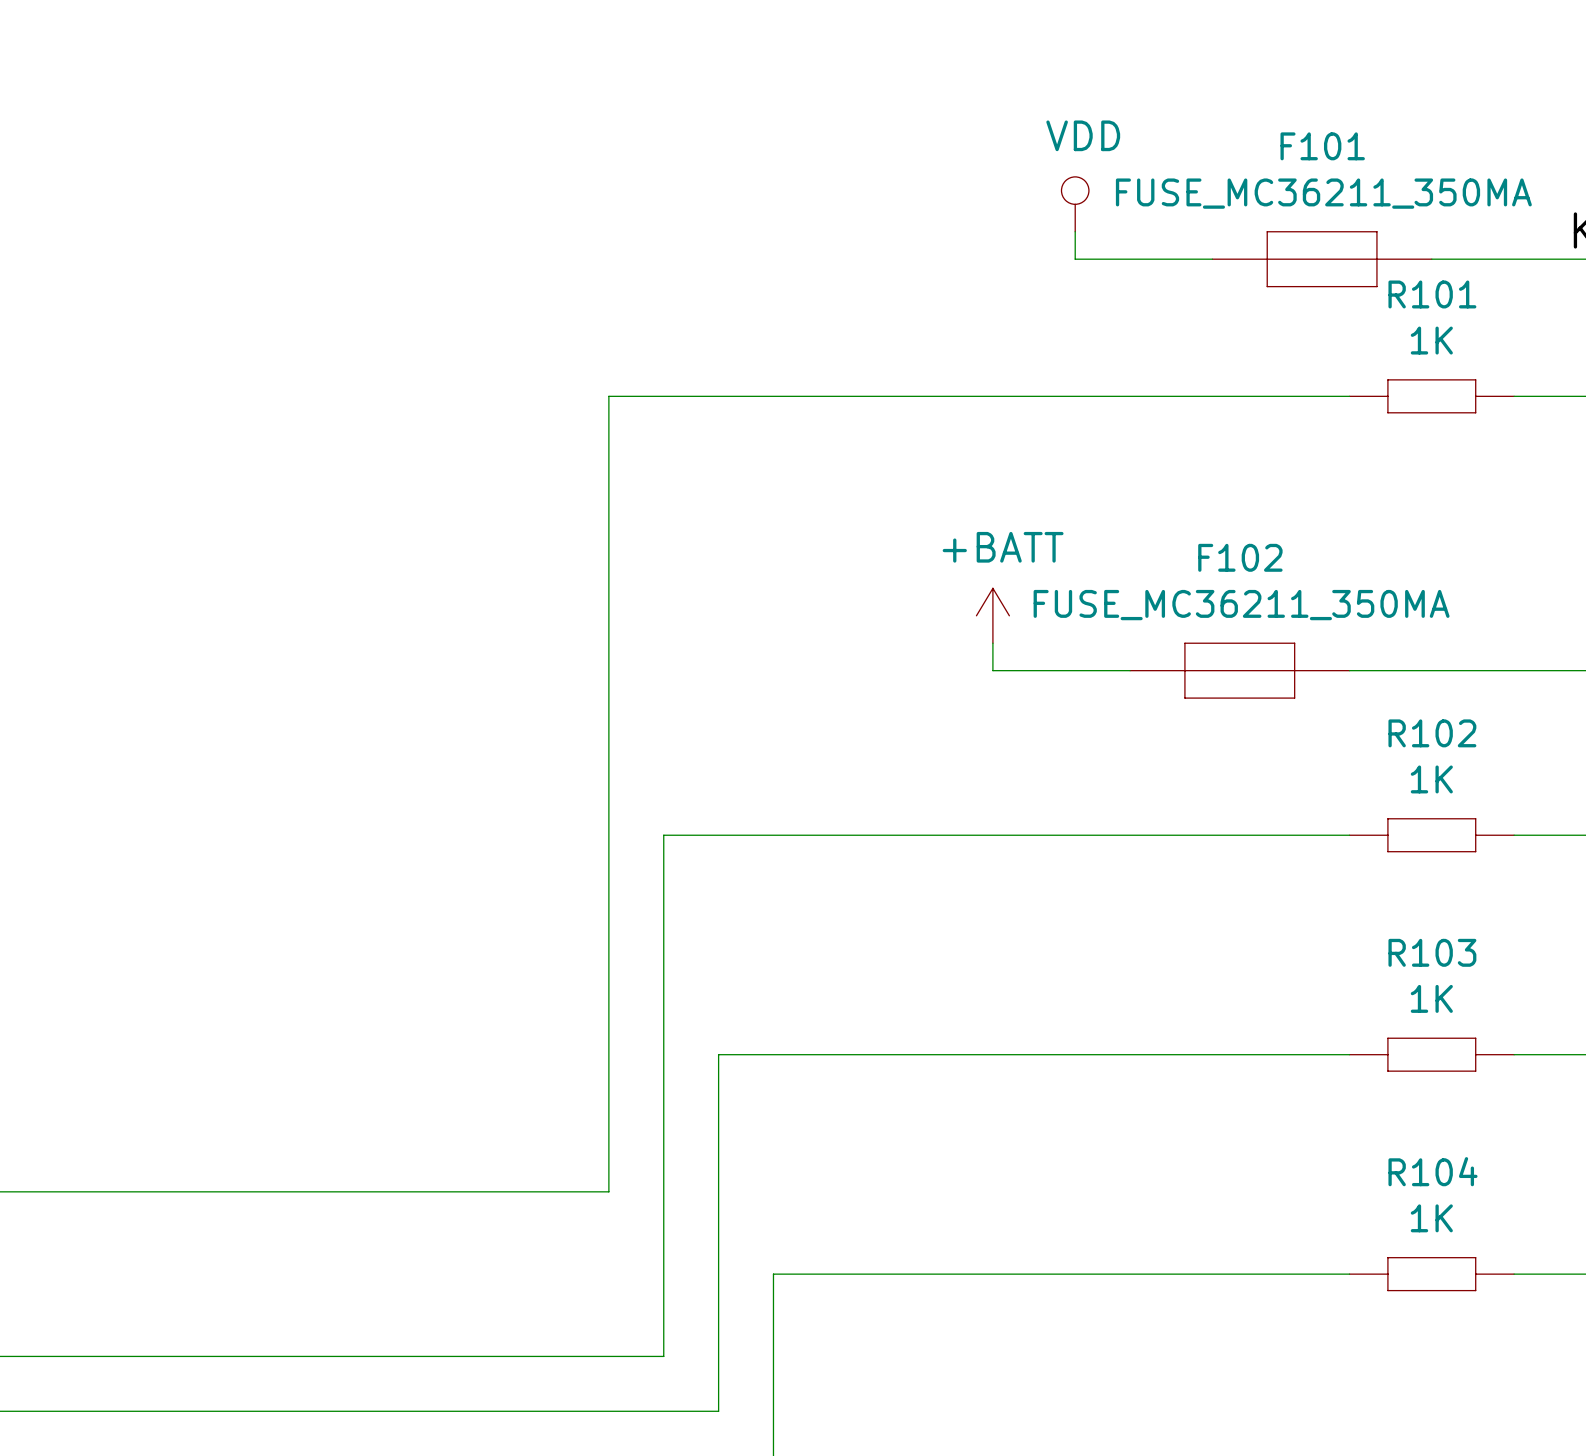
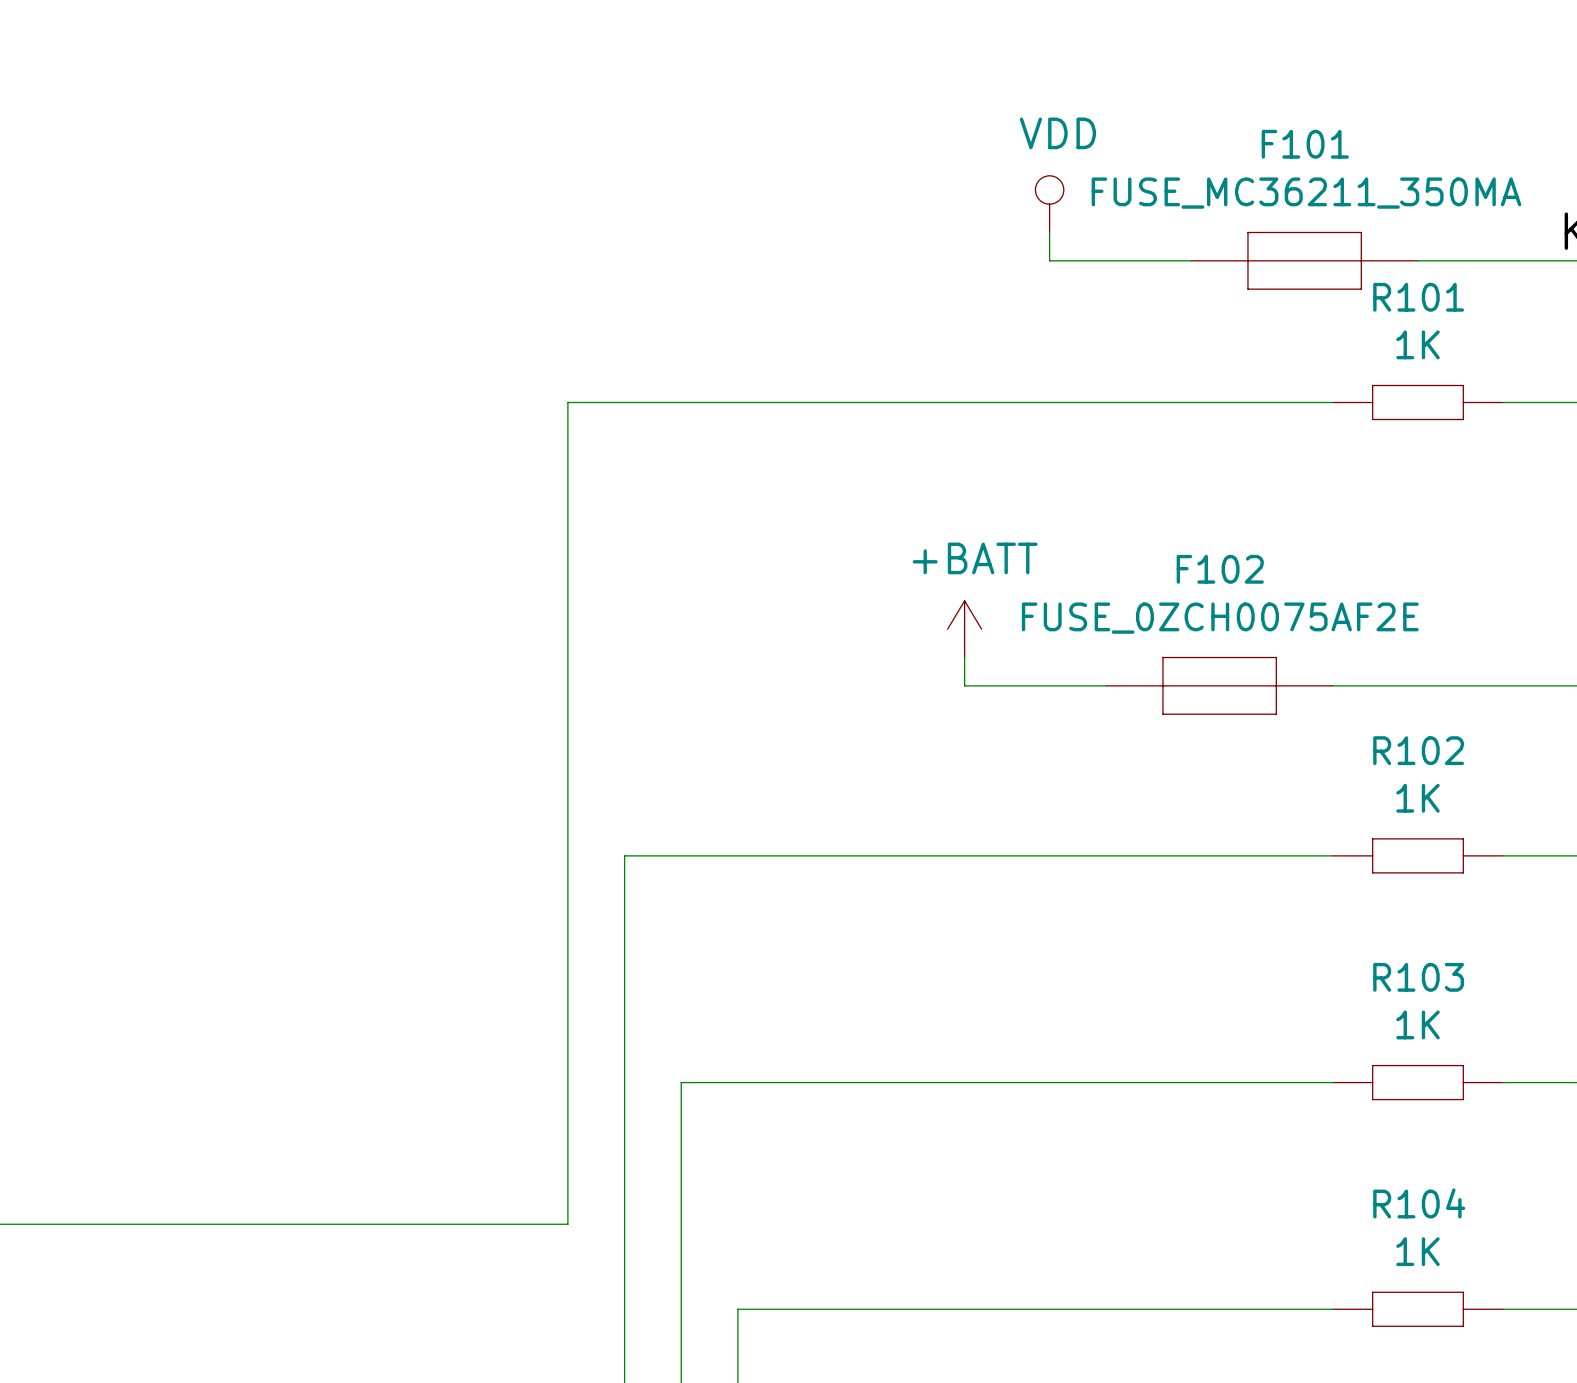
F102 value: FUSE_MC36211_350MA (1241, 605) -> FUSE_0ZCH0075AF2E (1220, 618)

